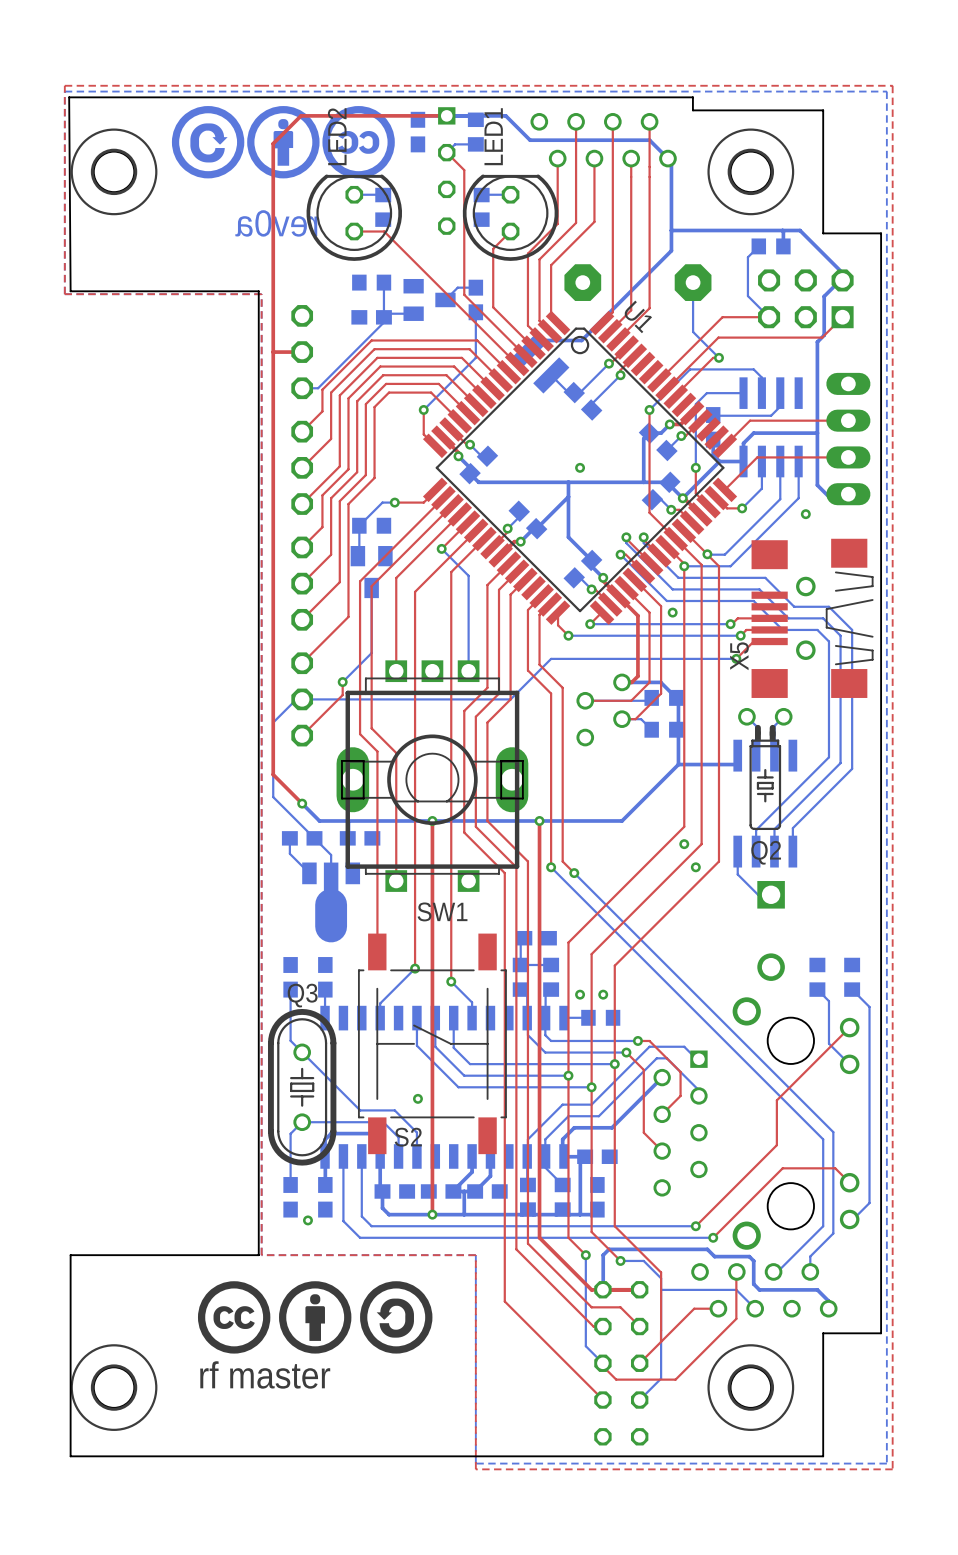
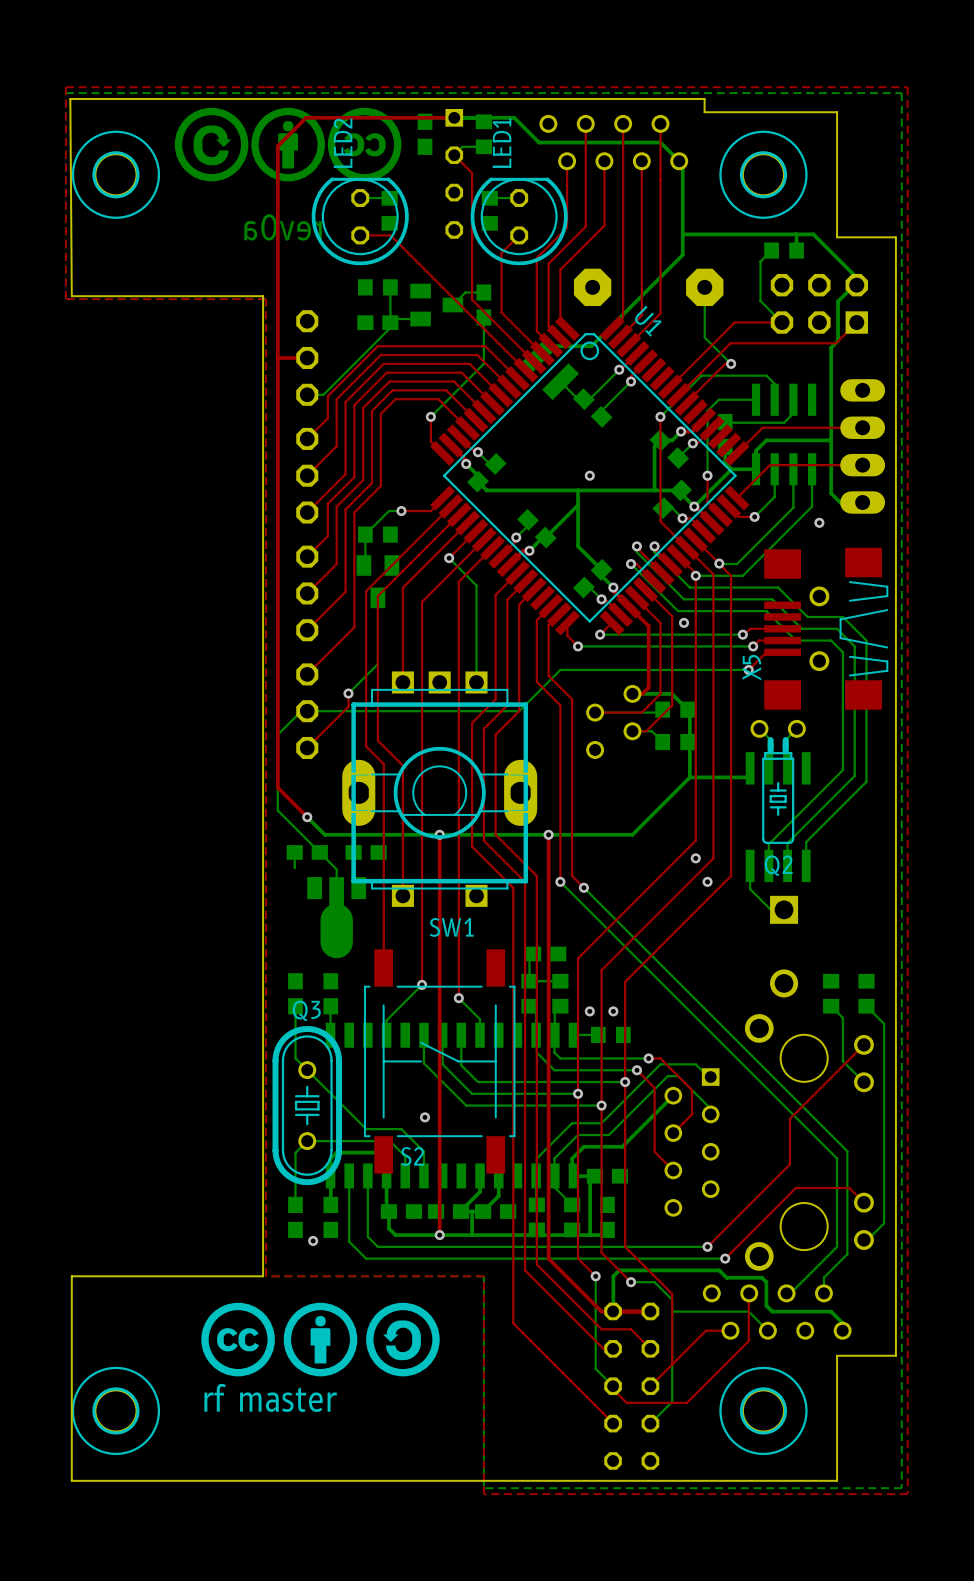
bottom track: (289, 853) (309, 873) -> none

